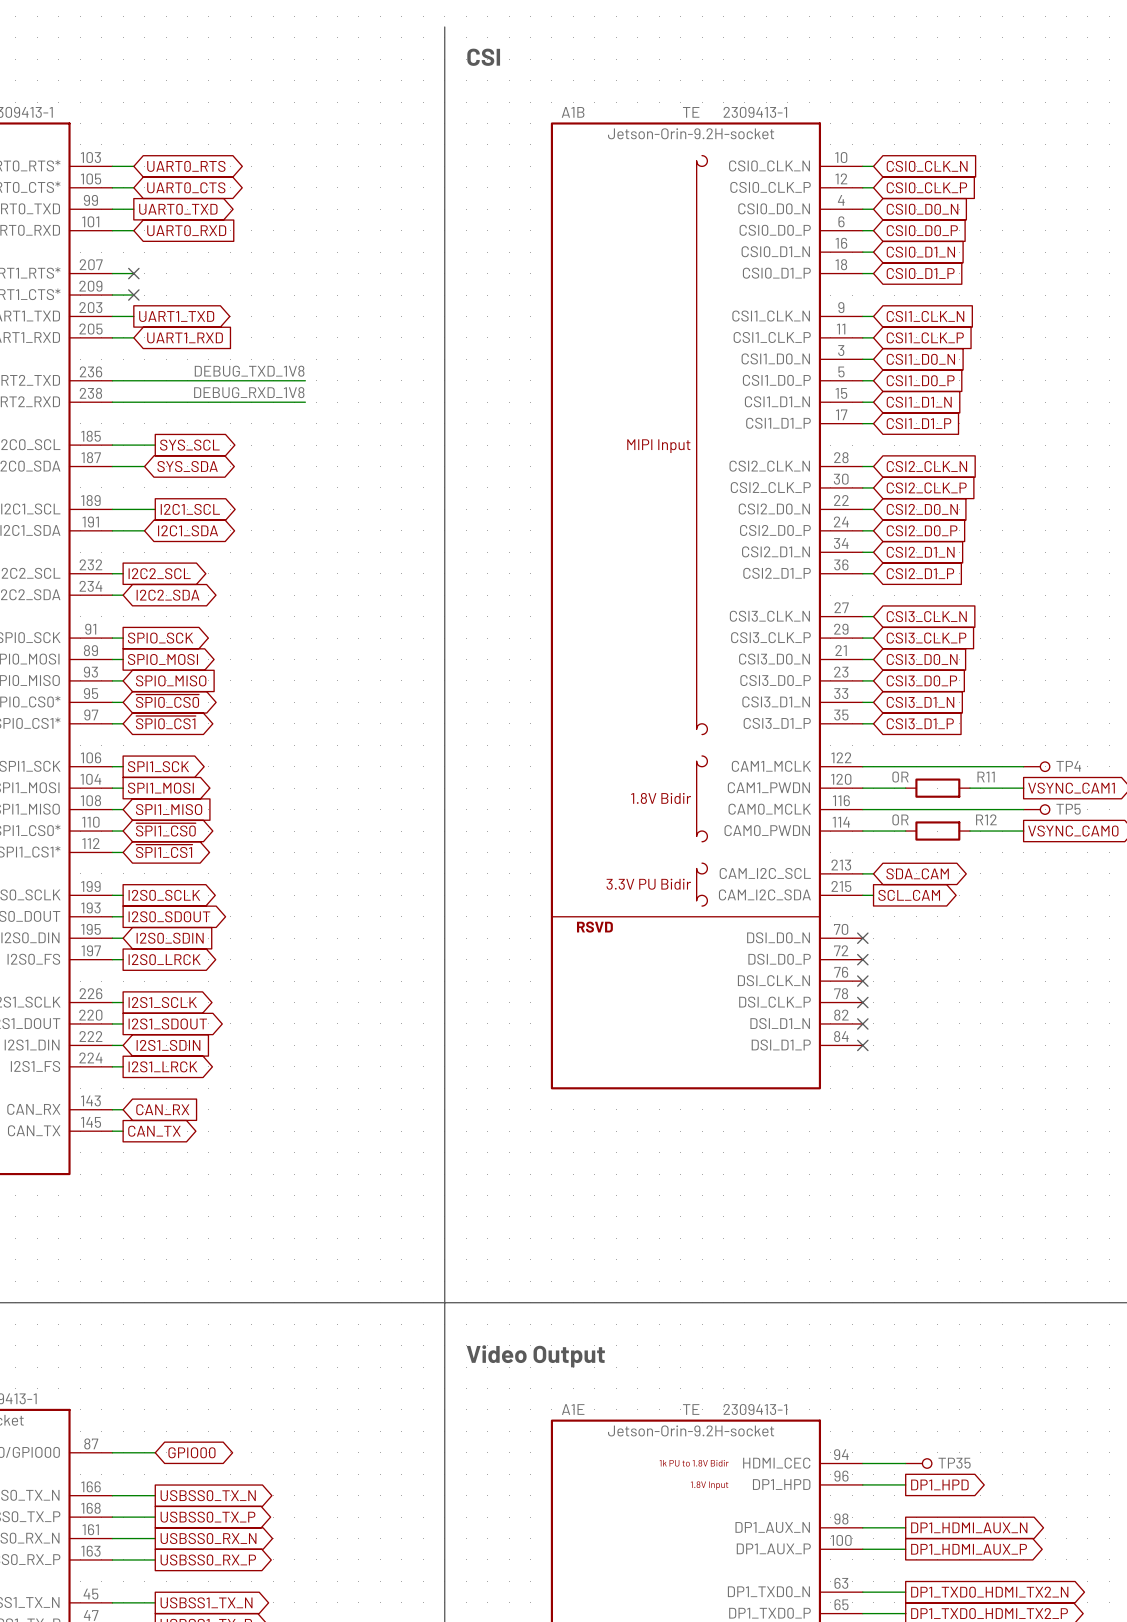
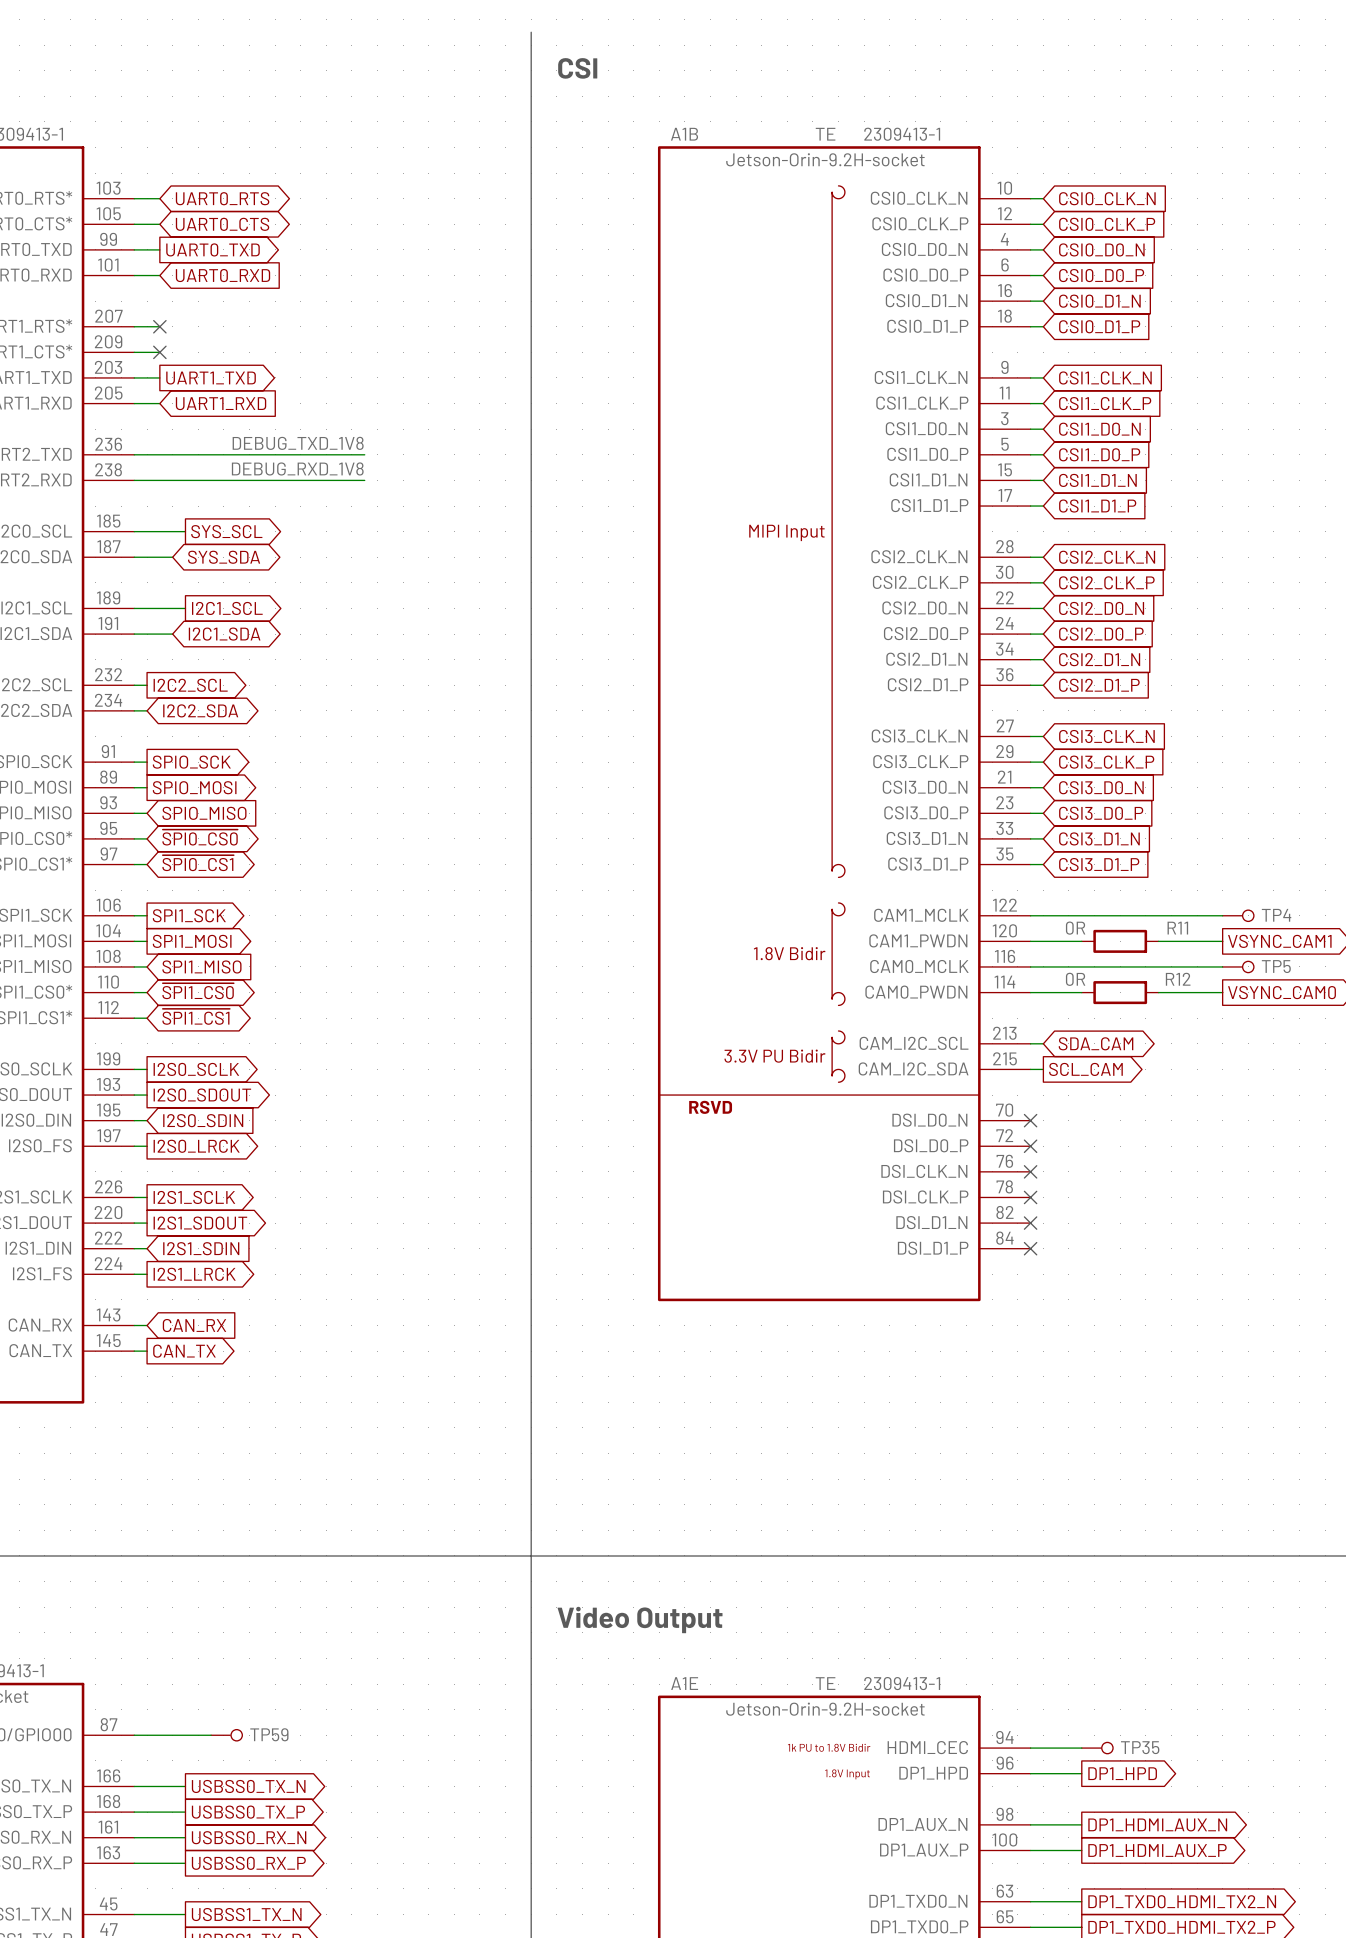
wire: none -> (185, 1735) (211, 1735)
TP59: none -> (226, 1735)
global label: GPIO00 (191, 1452) -> none

